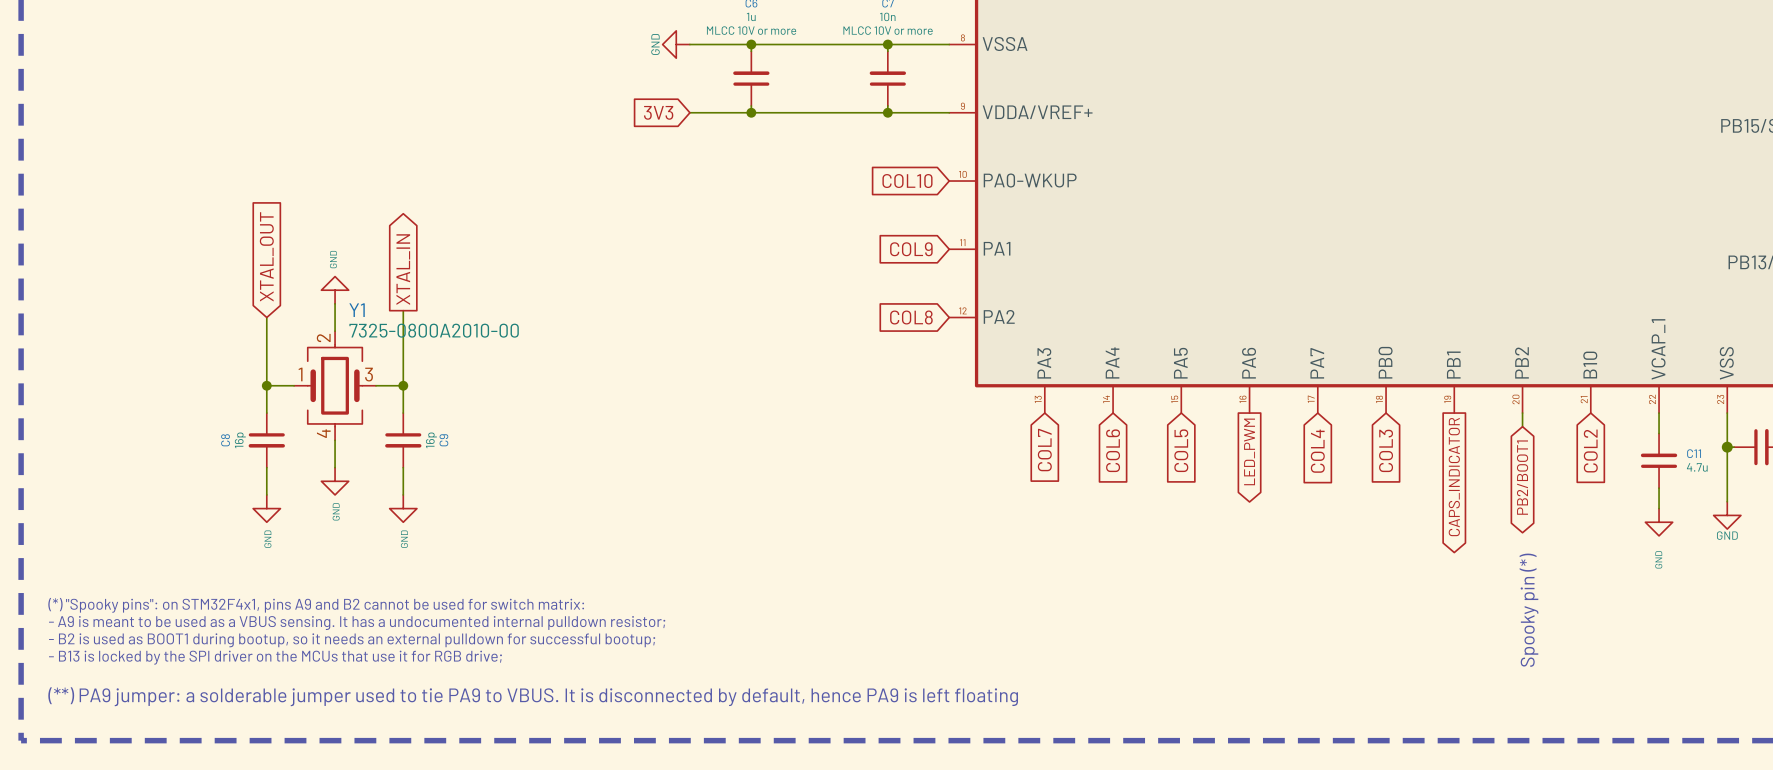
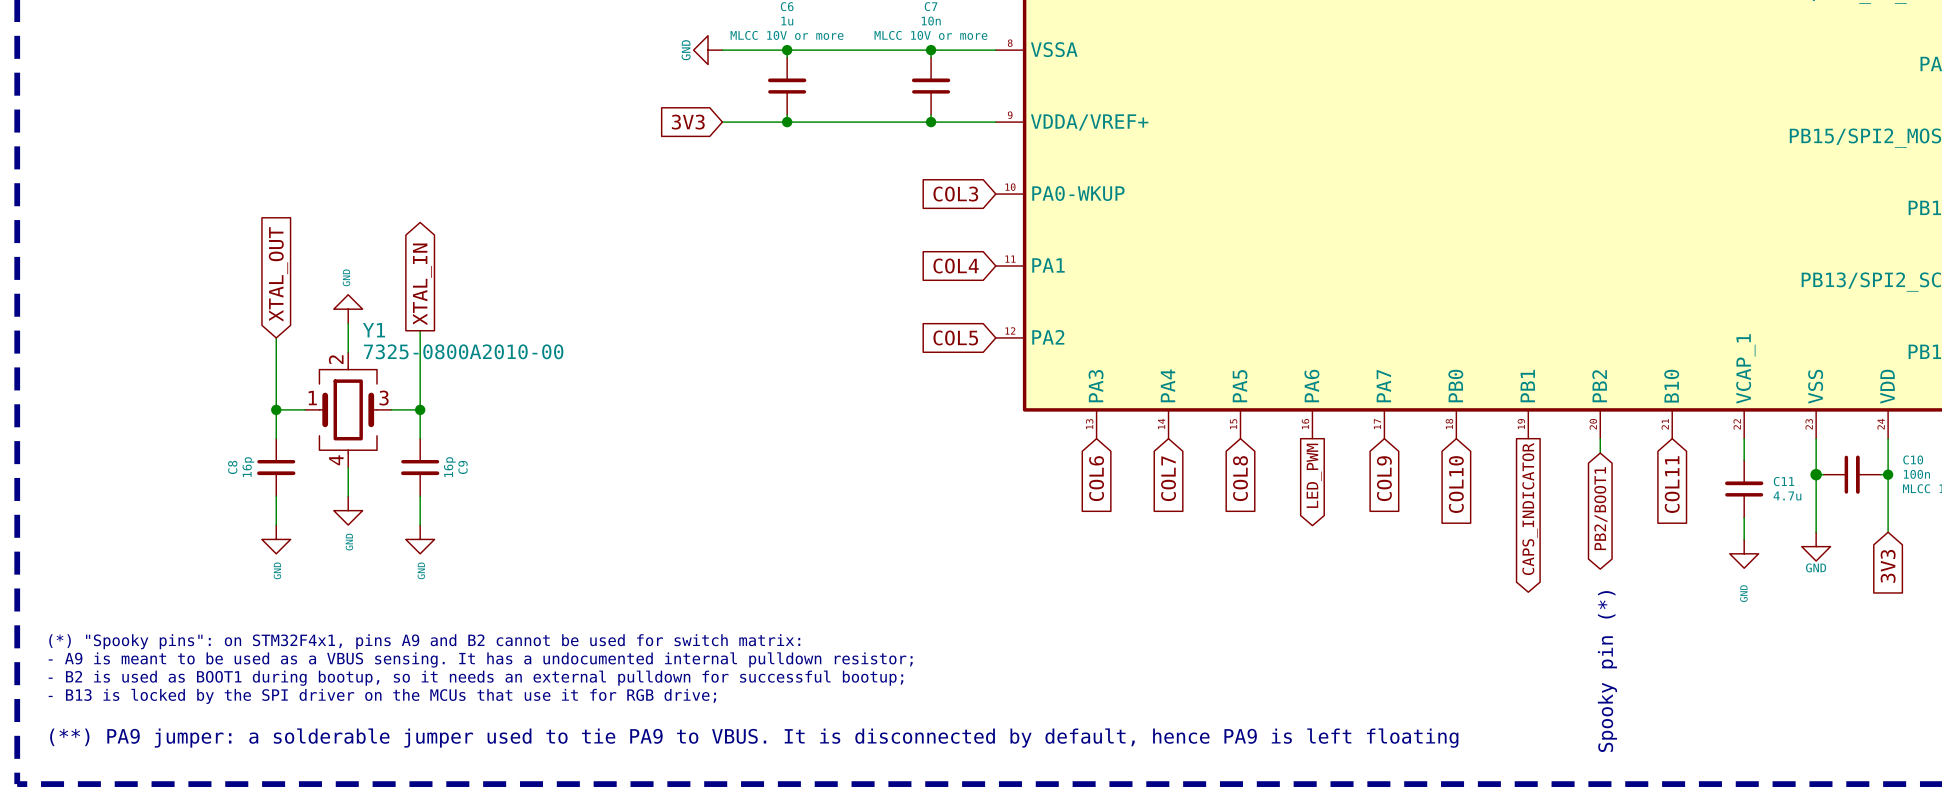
global label: COL10 (907, 181) -> COL3 (955, 194)
global label: COL9 (911, 249) -> COL4 (956, 266)
global label: COL8 (911, 317) -> COL5 (955, 337)
global label: COL7 (1044, 450) -> COL6 (1096, 478)
global label: COL6 (1113, 450) -> COL7 (1168, 478)
global label: COL5 (1181, 450) -> COL8 (1240, 478)
global label: COL3 (1386, 450) -> COL10 (1456, 484)
global label: COL4 (1317, 451) -> COL9 (1384, 478)
global label: COL2 (1590, 451) -> COL11 (1672, 484)

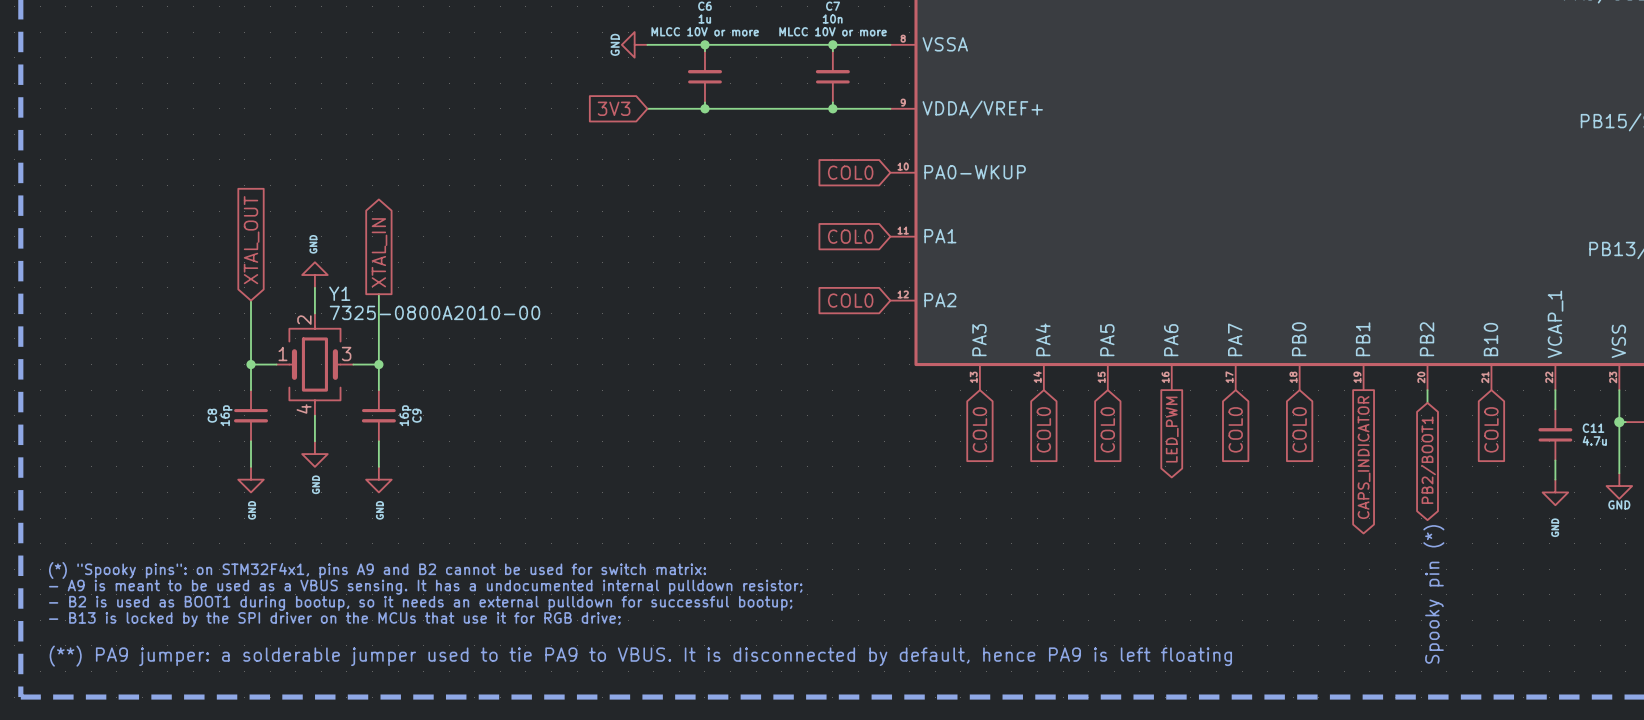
global label: COL3 (955, 194) -> COL0 (850, 172)
global label: COL4 (956, 266) -> COL0 (850, 236)
global label: COL5 (955, 337) -> COL0 (850, 300)
global label: COL6 (1096, 478) -> COL0 (979, 429)
global label: COL7 (1168, 478) -> COL0 (1043, 429)
global label: COL8 (1240, 478) -> COL0 (1107, 429)
global label: COL9 (1384, 478) -> COL0 (1235, 429)
global label: COL10 (1456, 484) -> COL0 (1299, 429)
global label: COL11 (1672, 484) -> COL0 (1491, 429)

